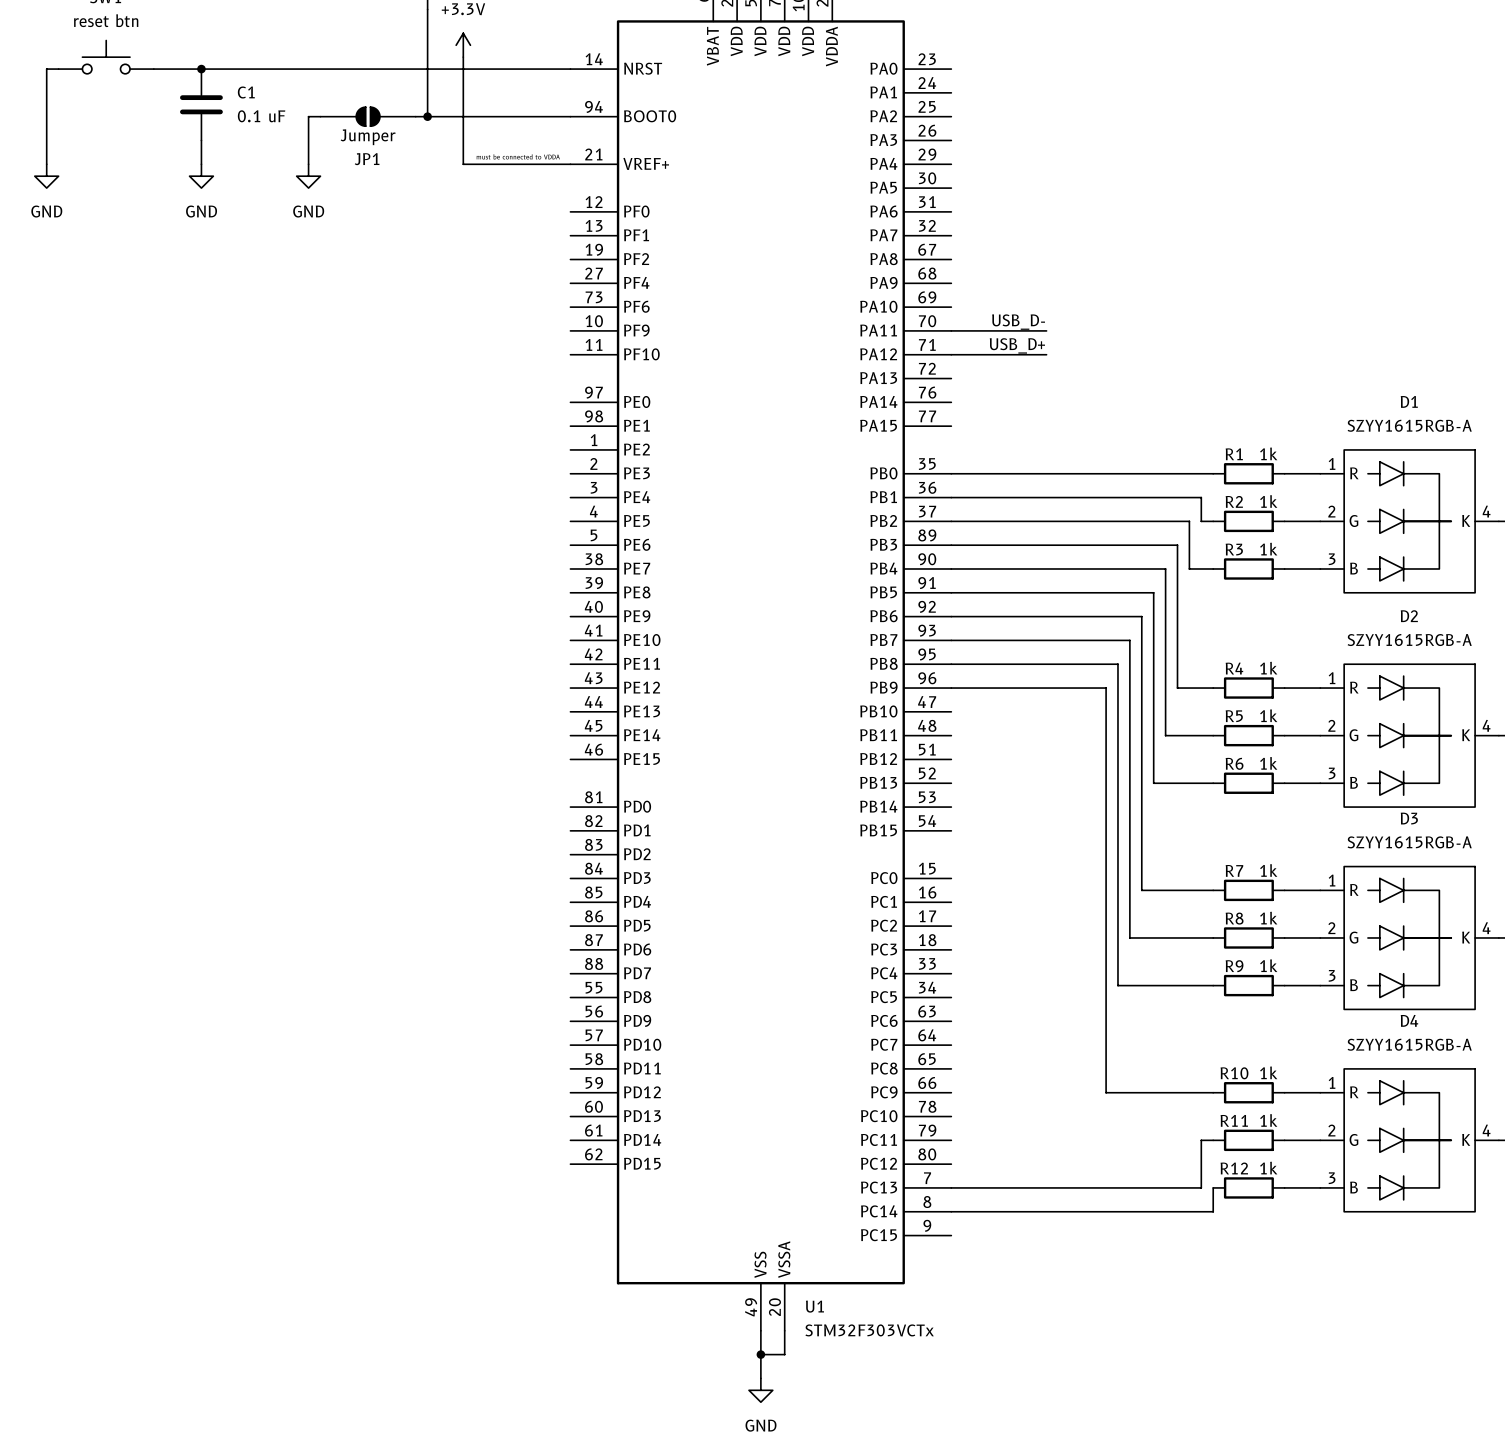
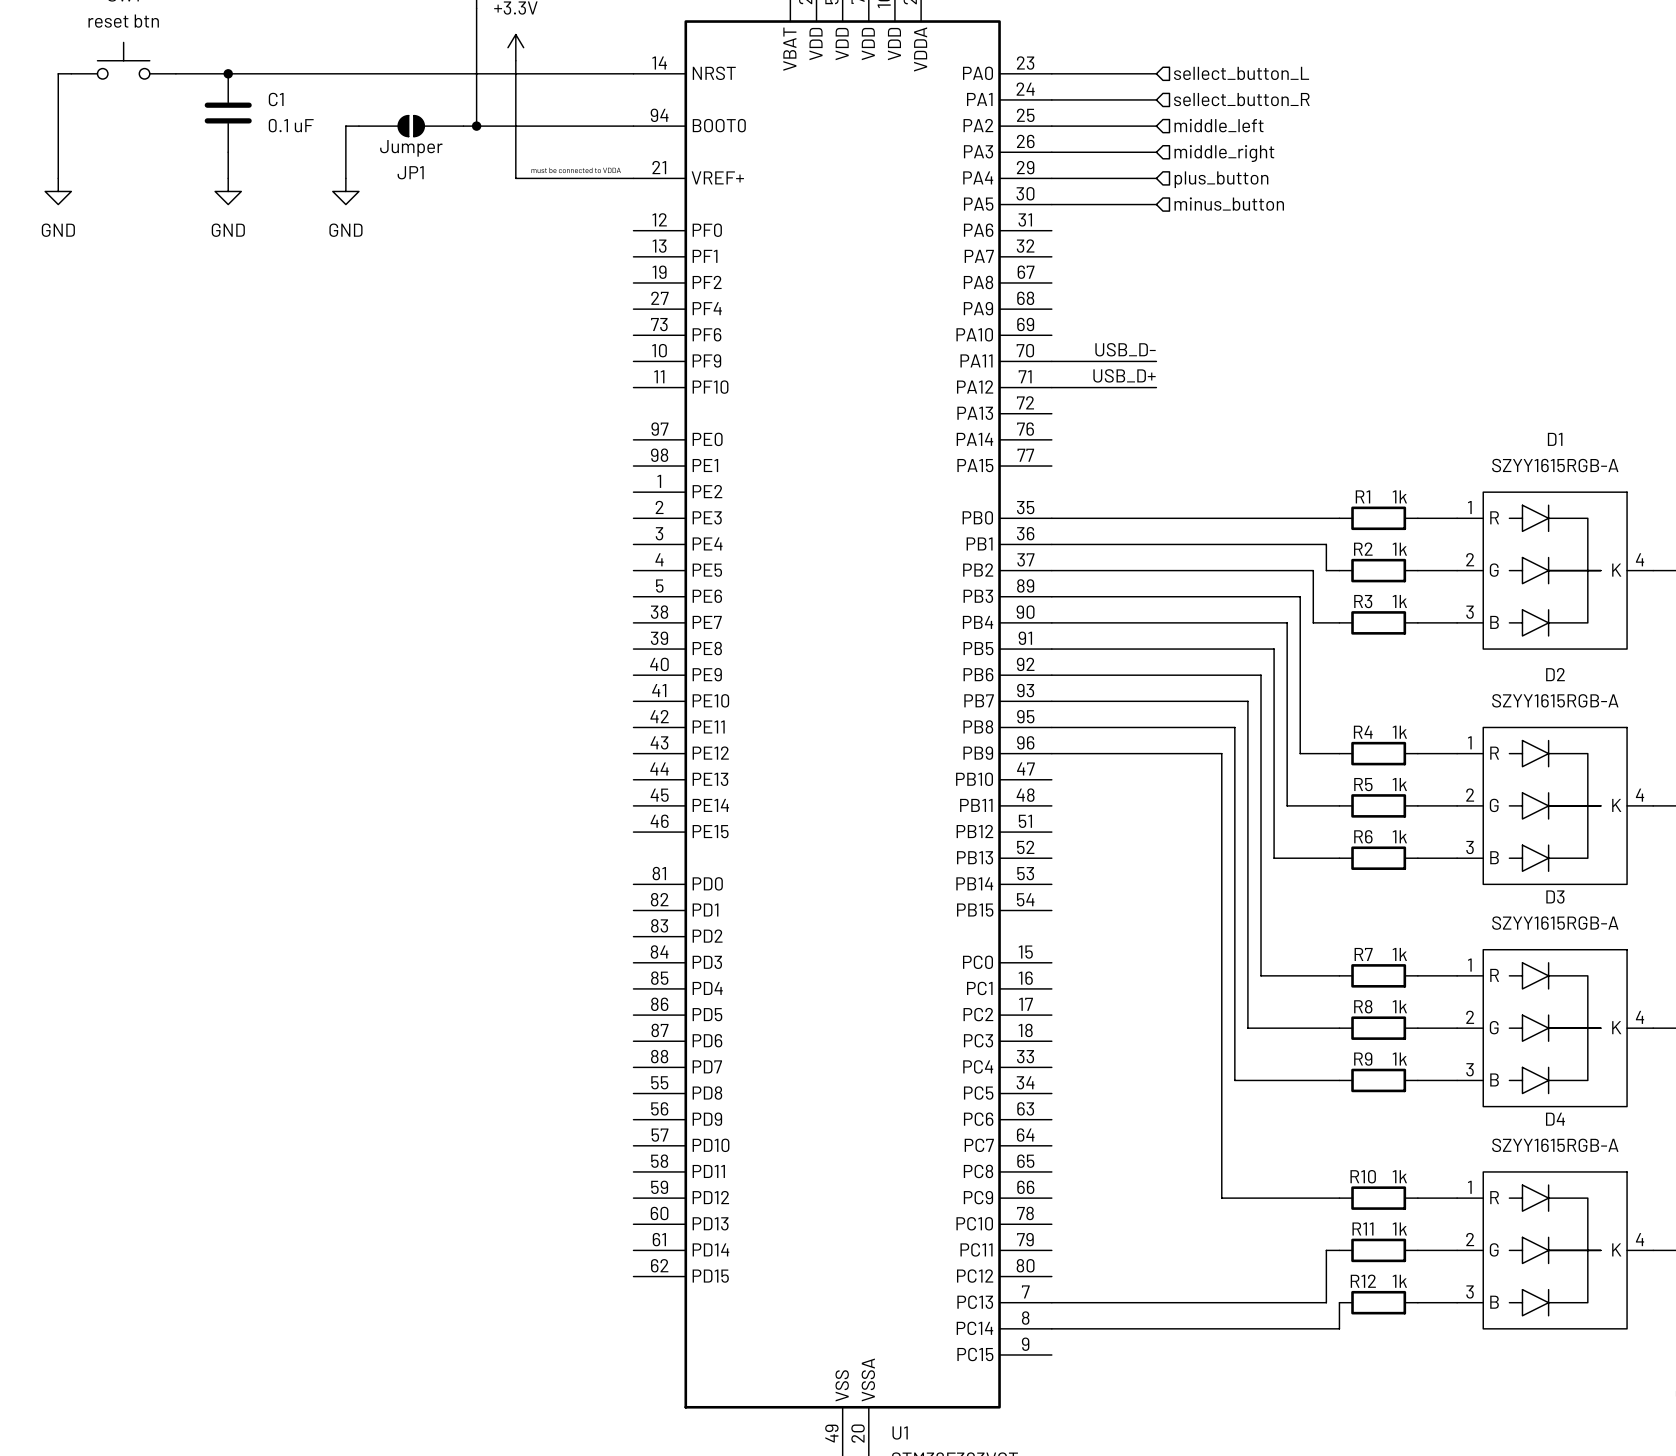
wire: none -> (1051, 73) (1156, 73)
hierarchical label: none -> sellect_button_L (1241, 73)
wire: none -> (1051, 99) (1156, 99)
hierarchical label: none -> sellect_button_R (1241, 99)
wire: none -> (1051, 126) (1156, 126)
hierarchical label: none -> middle_left (1219, 125)
wire: none -> (1051, 152) (1156, 152)
hierarchical label: none -> middle_right (1224, 153)
wire: none -> (1051, 178) (1156, 178)
hierarchical label: none -> plus_button (1221, 179)
wire: none -> (1051, 204) (1156, 204)
hierarchical label: none -> minus_button (1229, 204)

